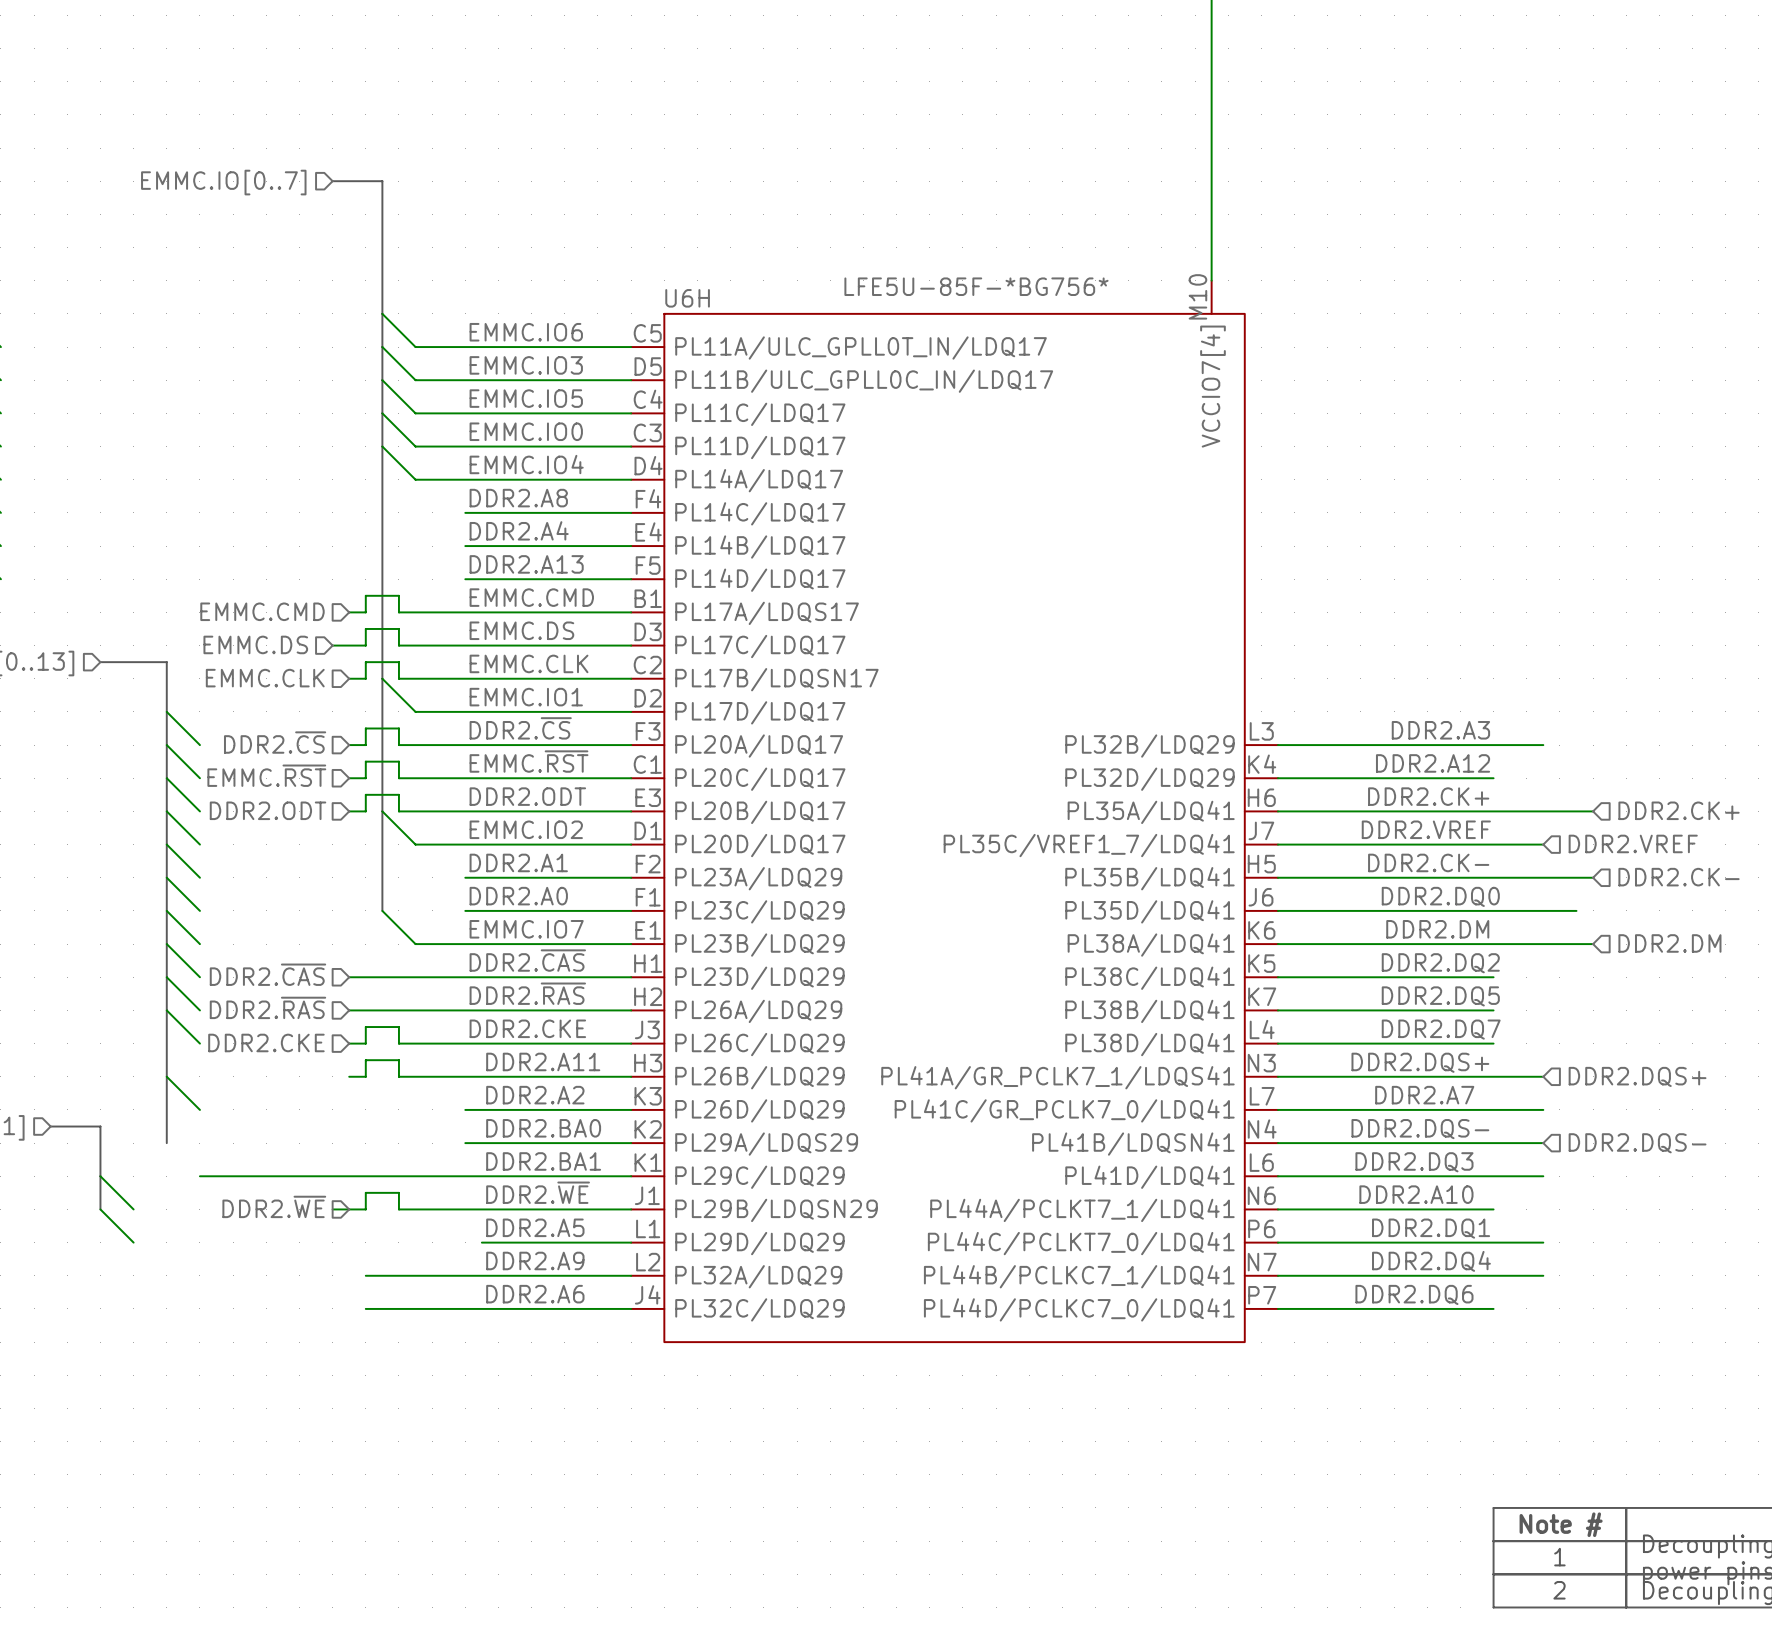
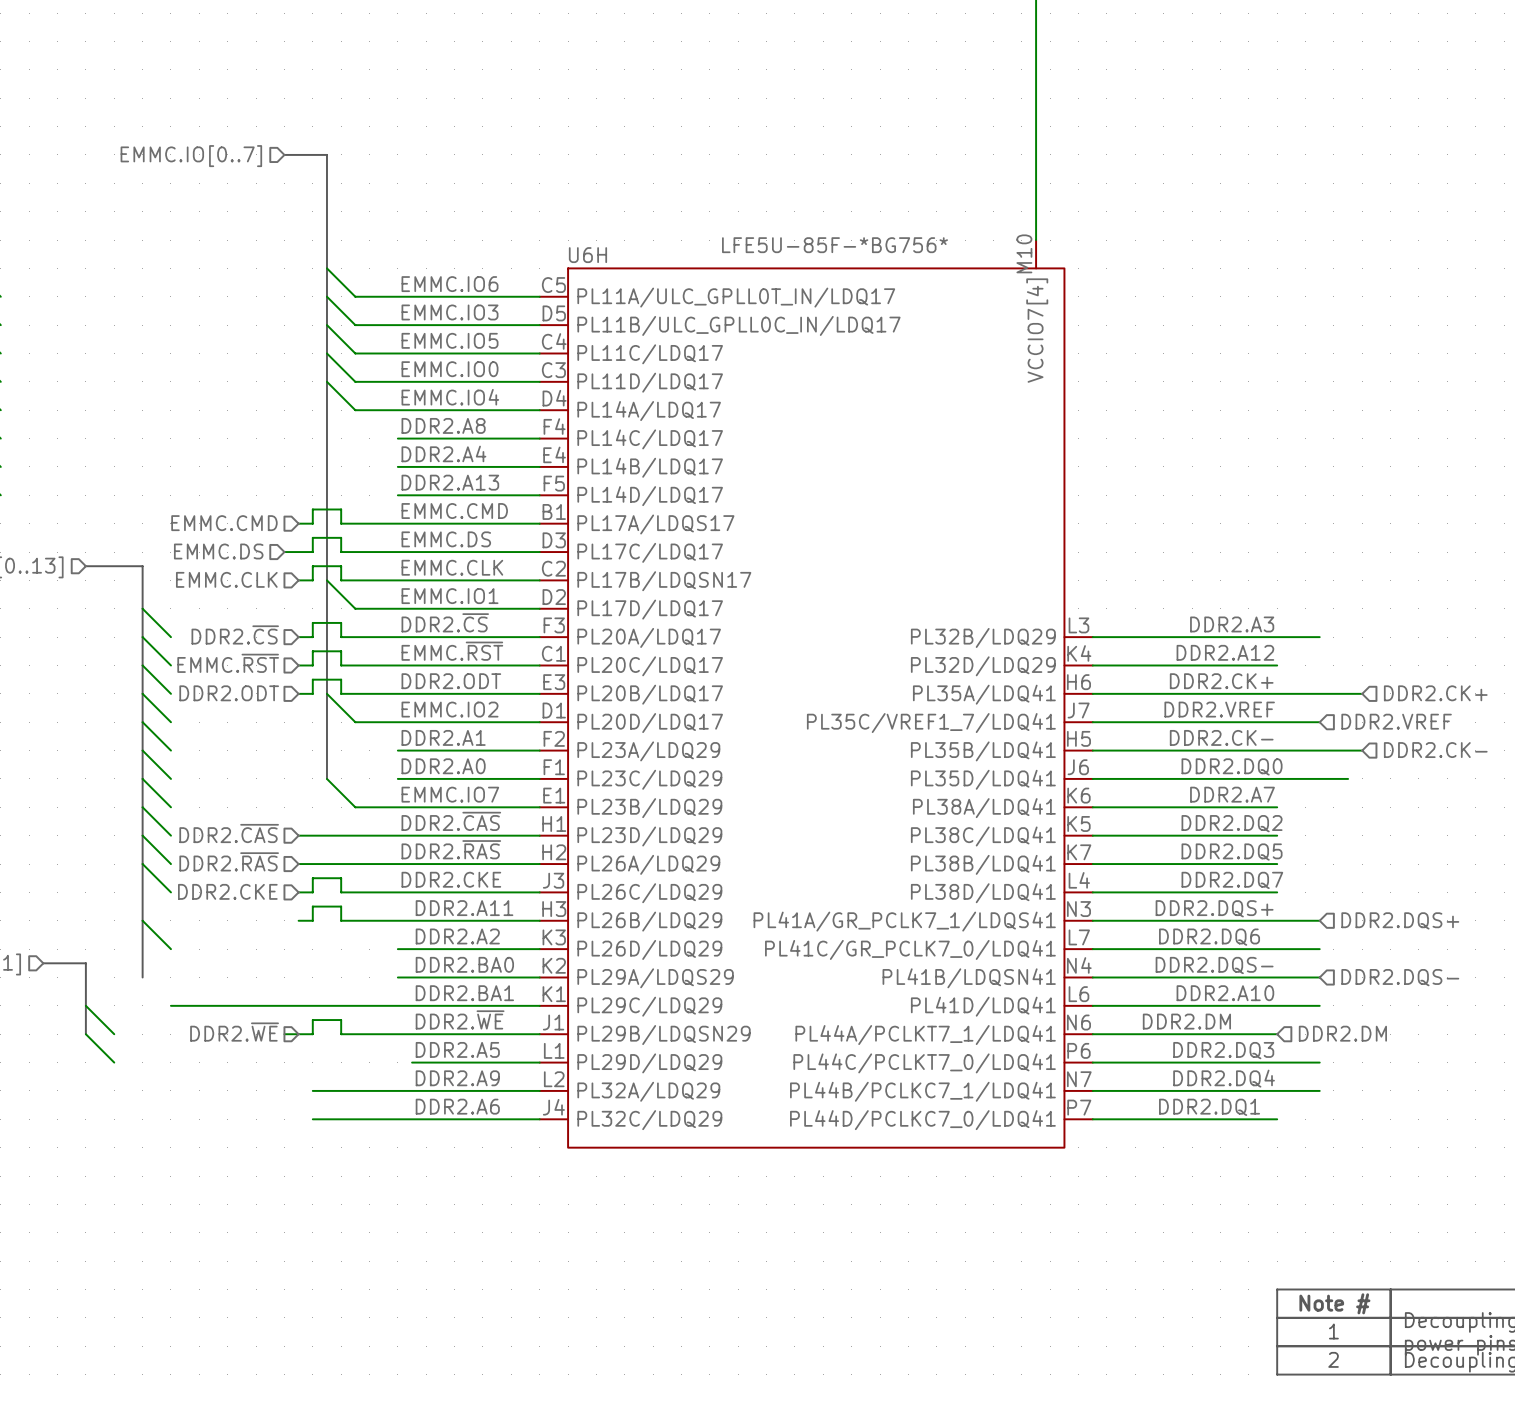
label: DDR2.DM (1437, 929) -> DDR2.A7 (1232, 794)
hierarchical label position: DDR2.DM (1669, 943) -> DDR2.DM (1342, 1033)
wire: (1493, 944) (1593, 944) -> none
label: DDR2.A7 (1424, 1095) -> DDR2.DQ6 (1209, 937)
label: DDR2.DQ3 (1414, 1162) -> DDR2.DM (1186, 1021)
label position: DDR2.A10 (1416, 1194) -> DDR2.A10 (1225, 993)
label: DDR2.DQ1 (1431, 1228) -> DDR2.DQ3 (1223, 1050)
label: DDR2.DQ6 (1414, 1294) -> DDR2.DQ1 (1209, 1107)

